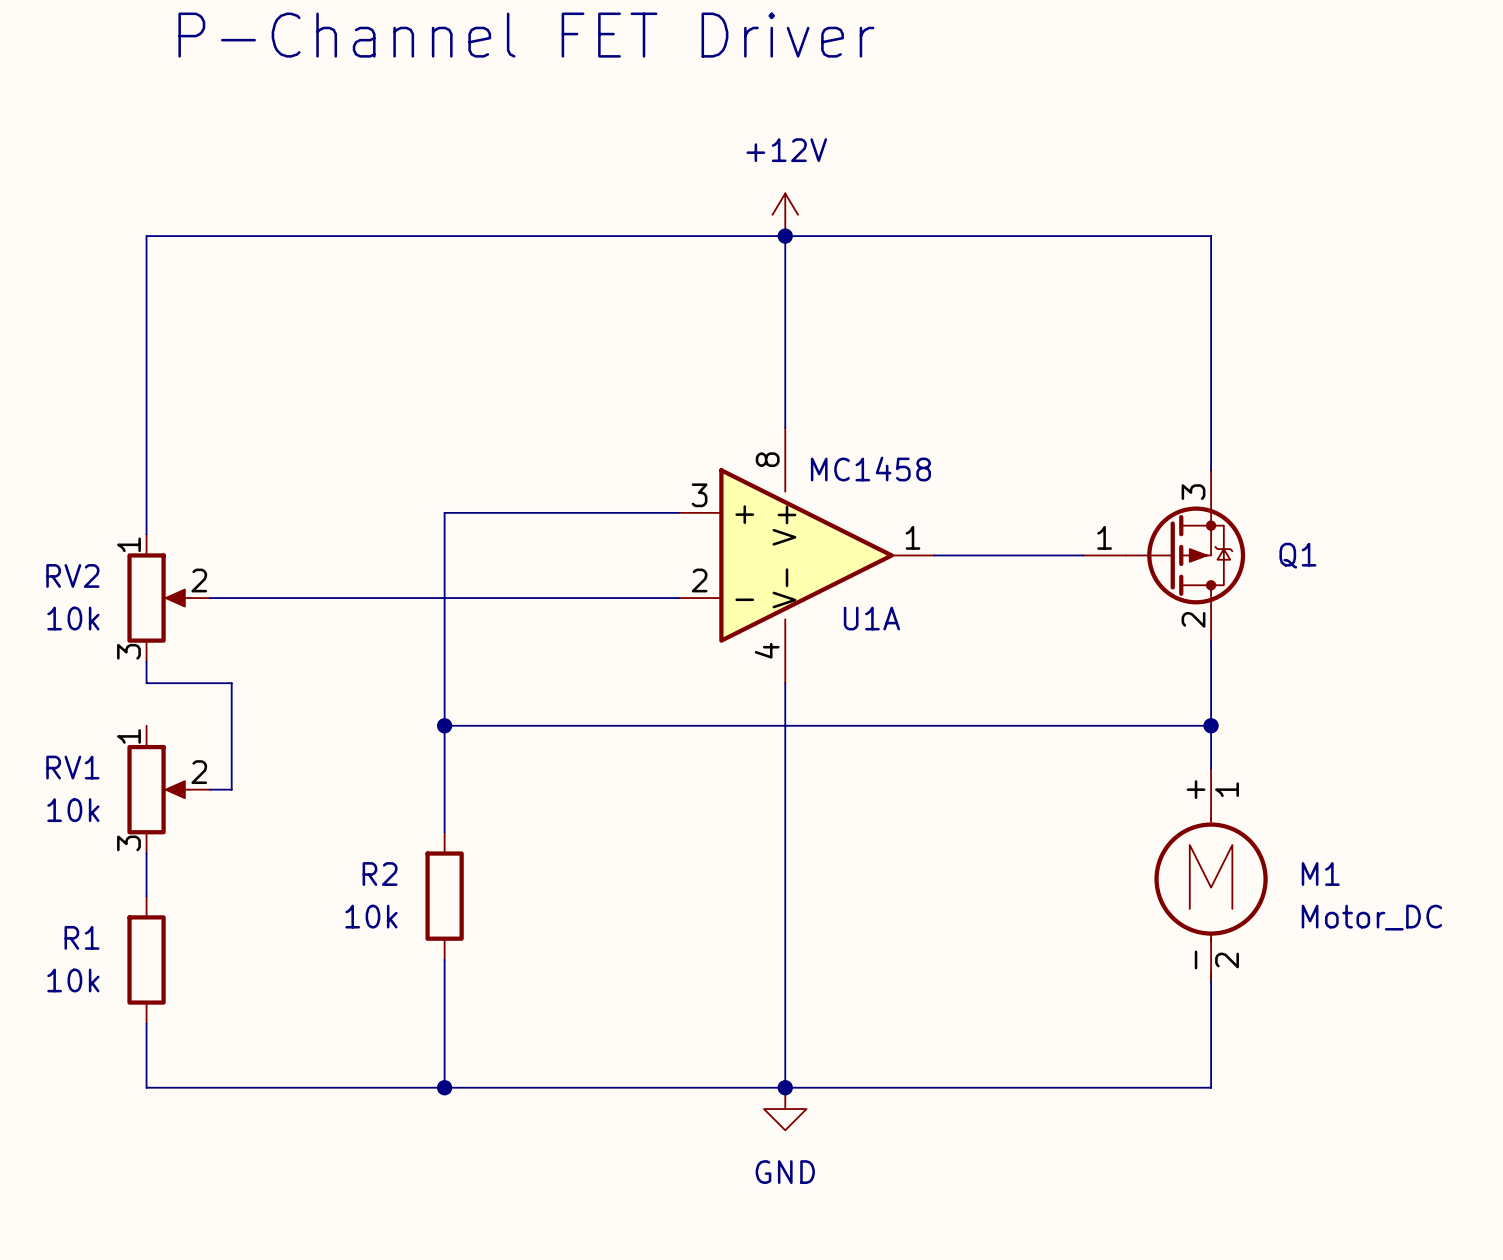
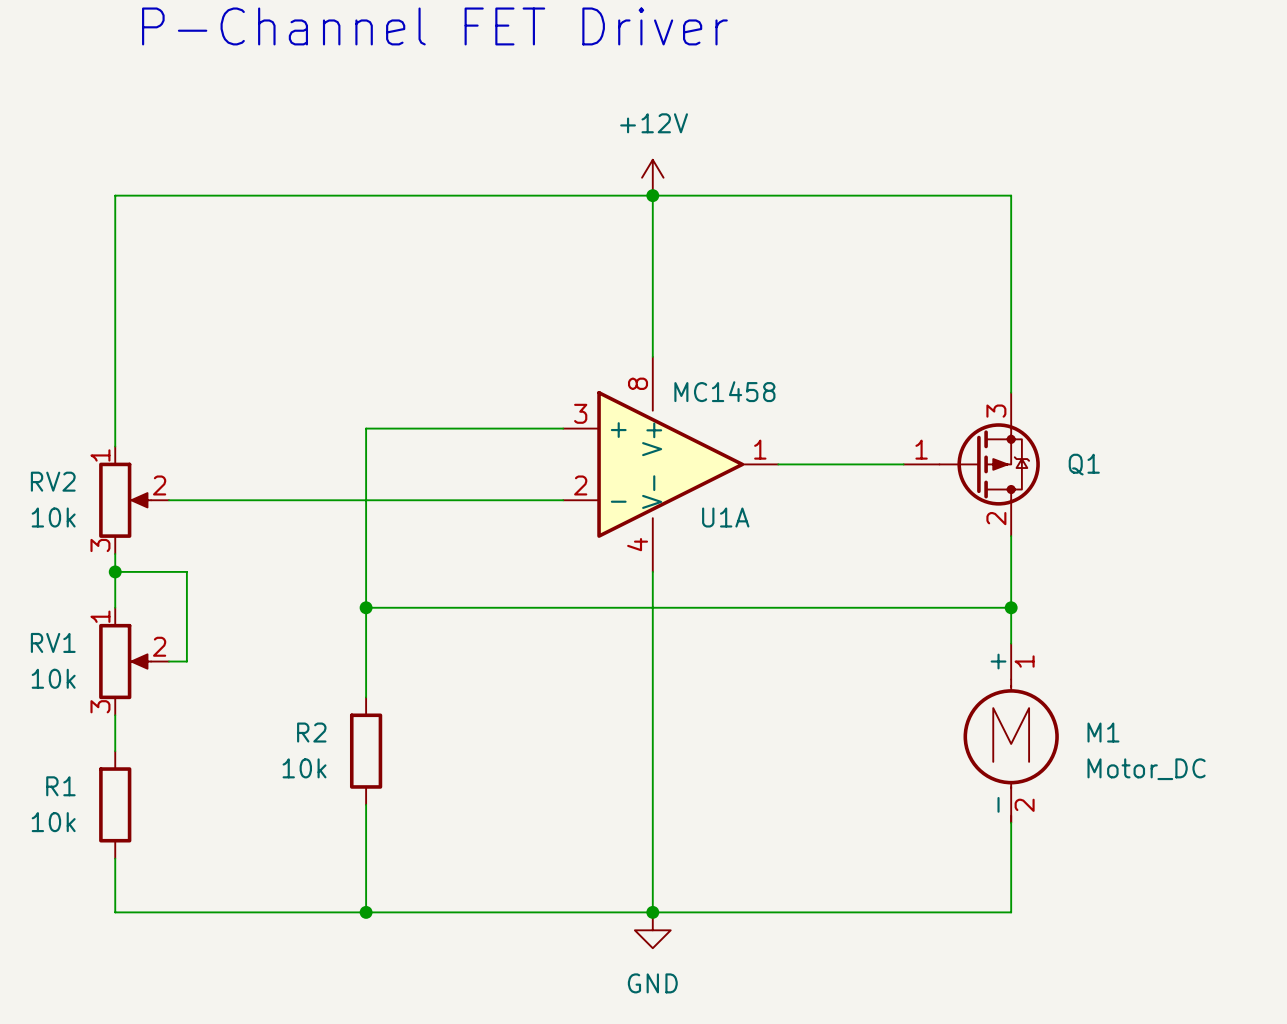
wire: none -> (115, 571) (115, 607)
junction: none -> (115, 571)

